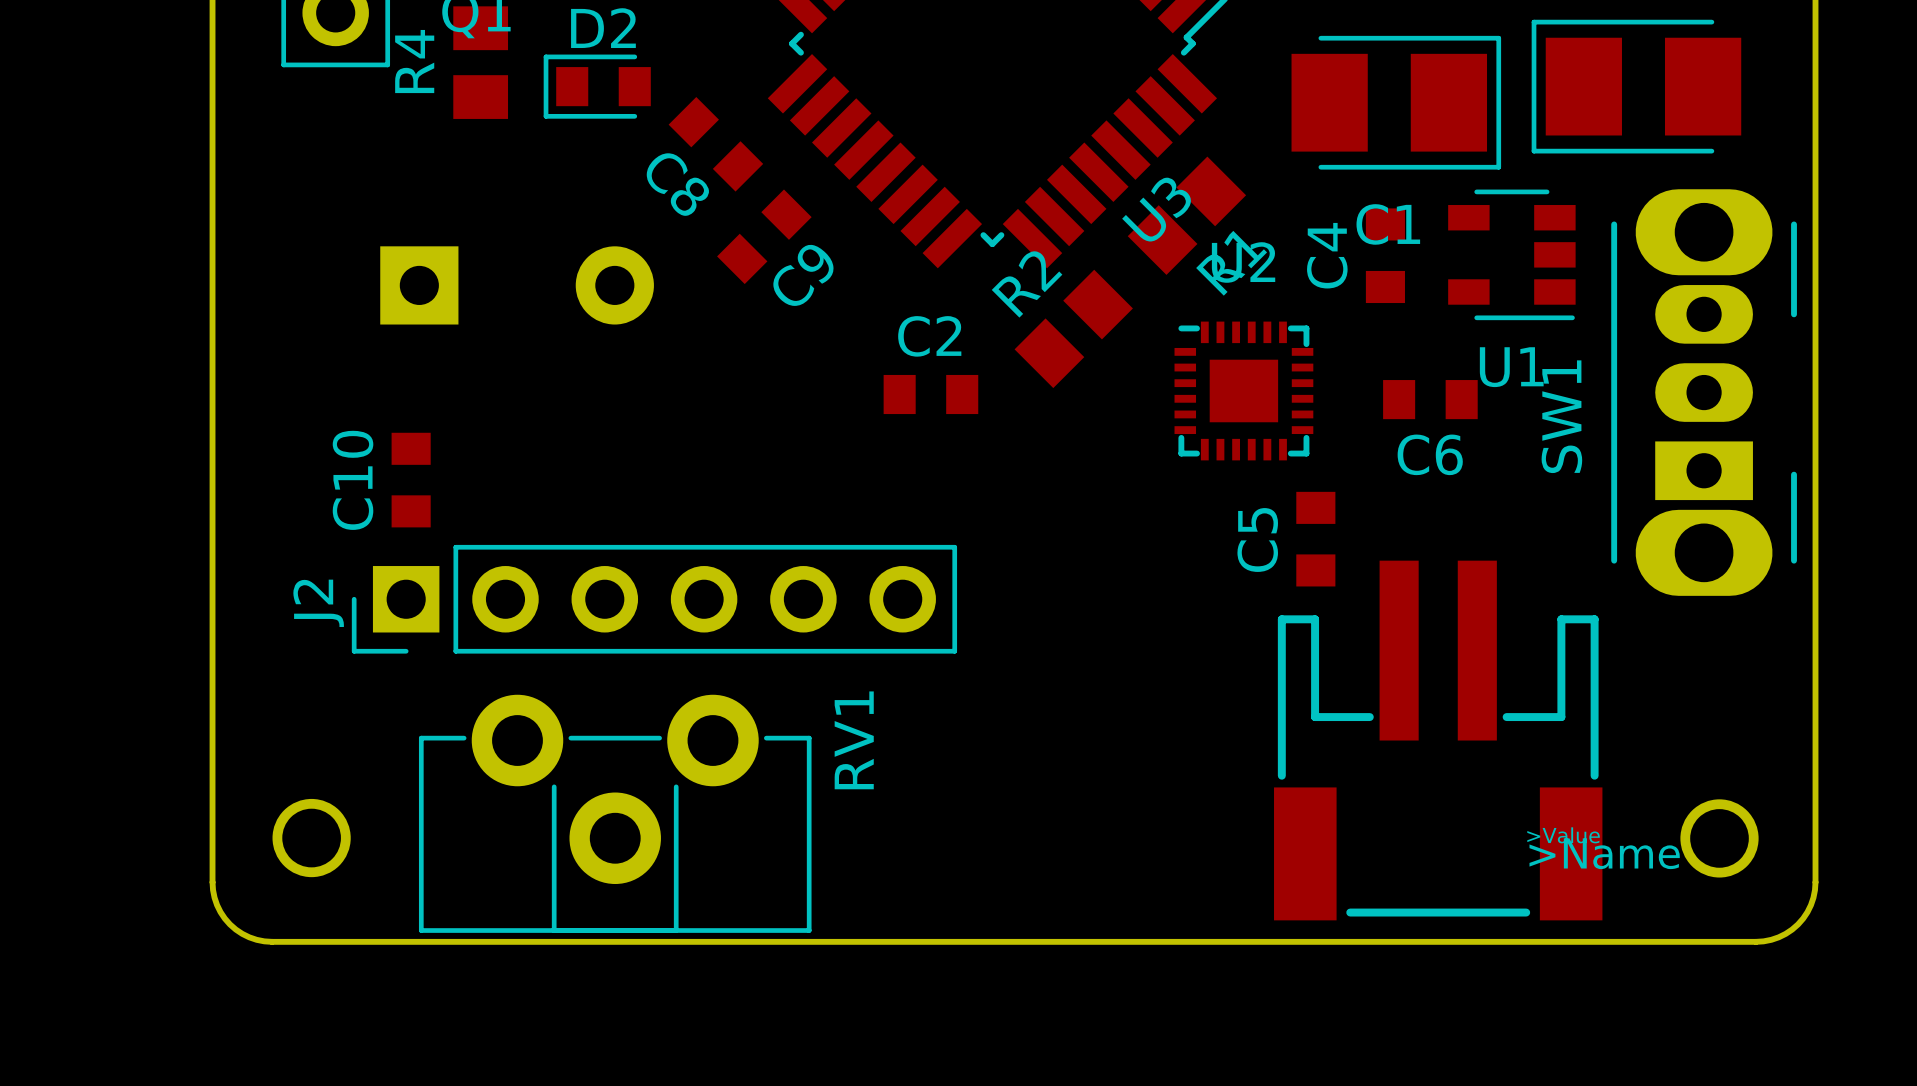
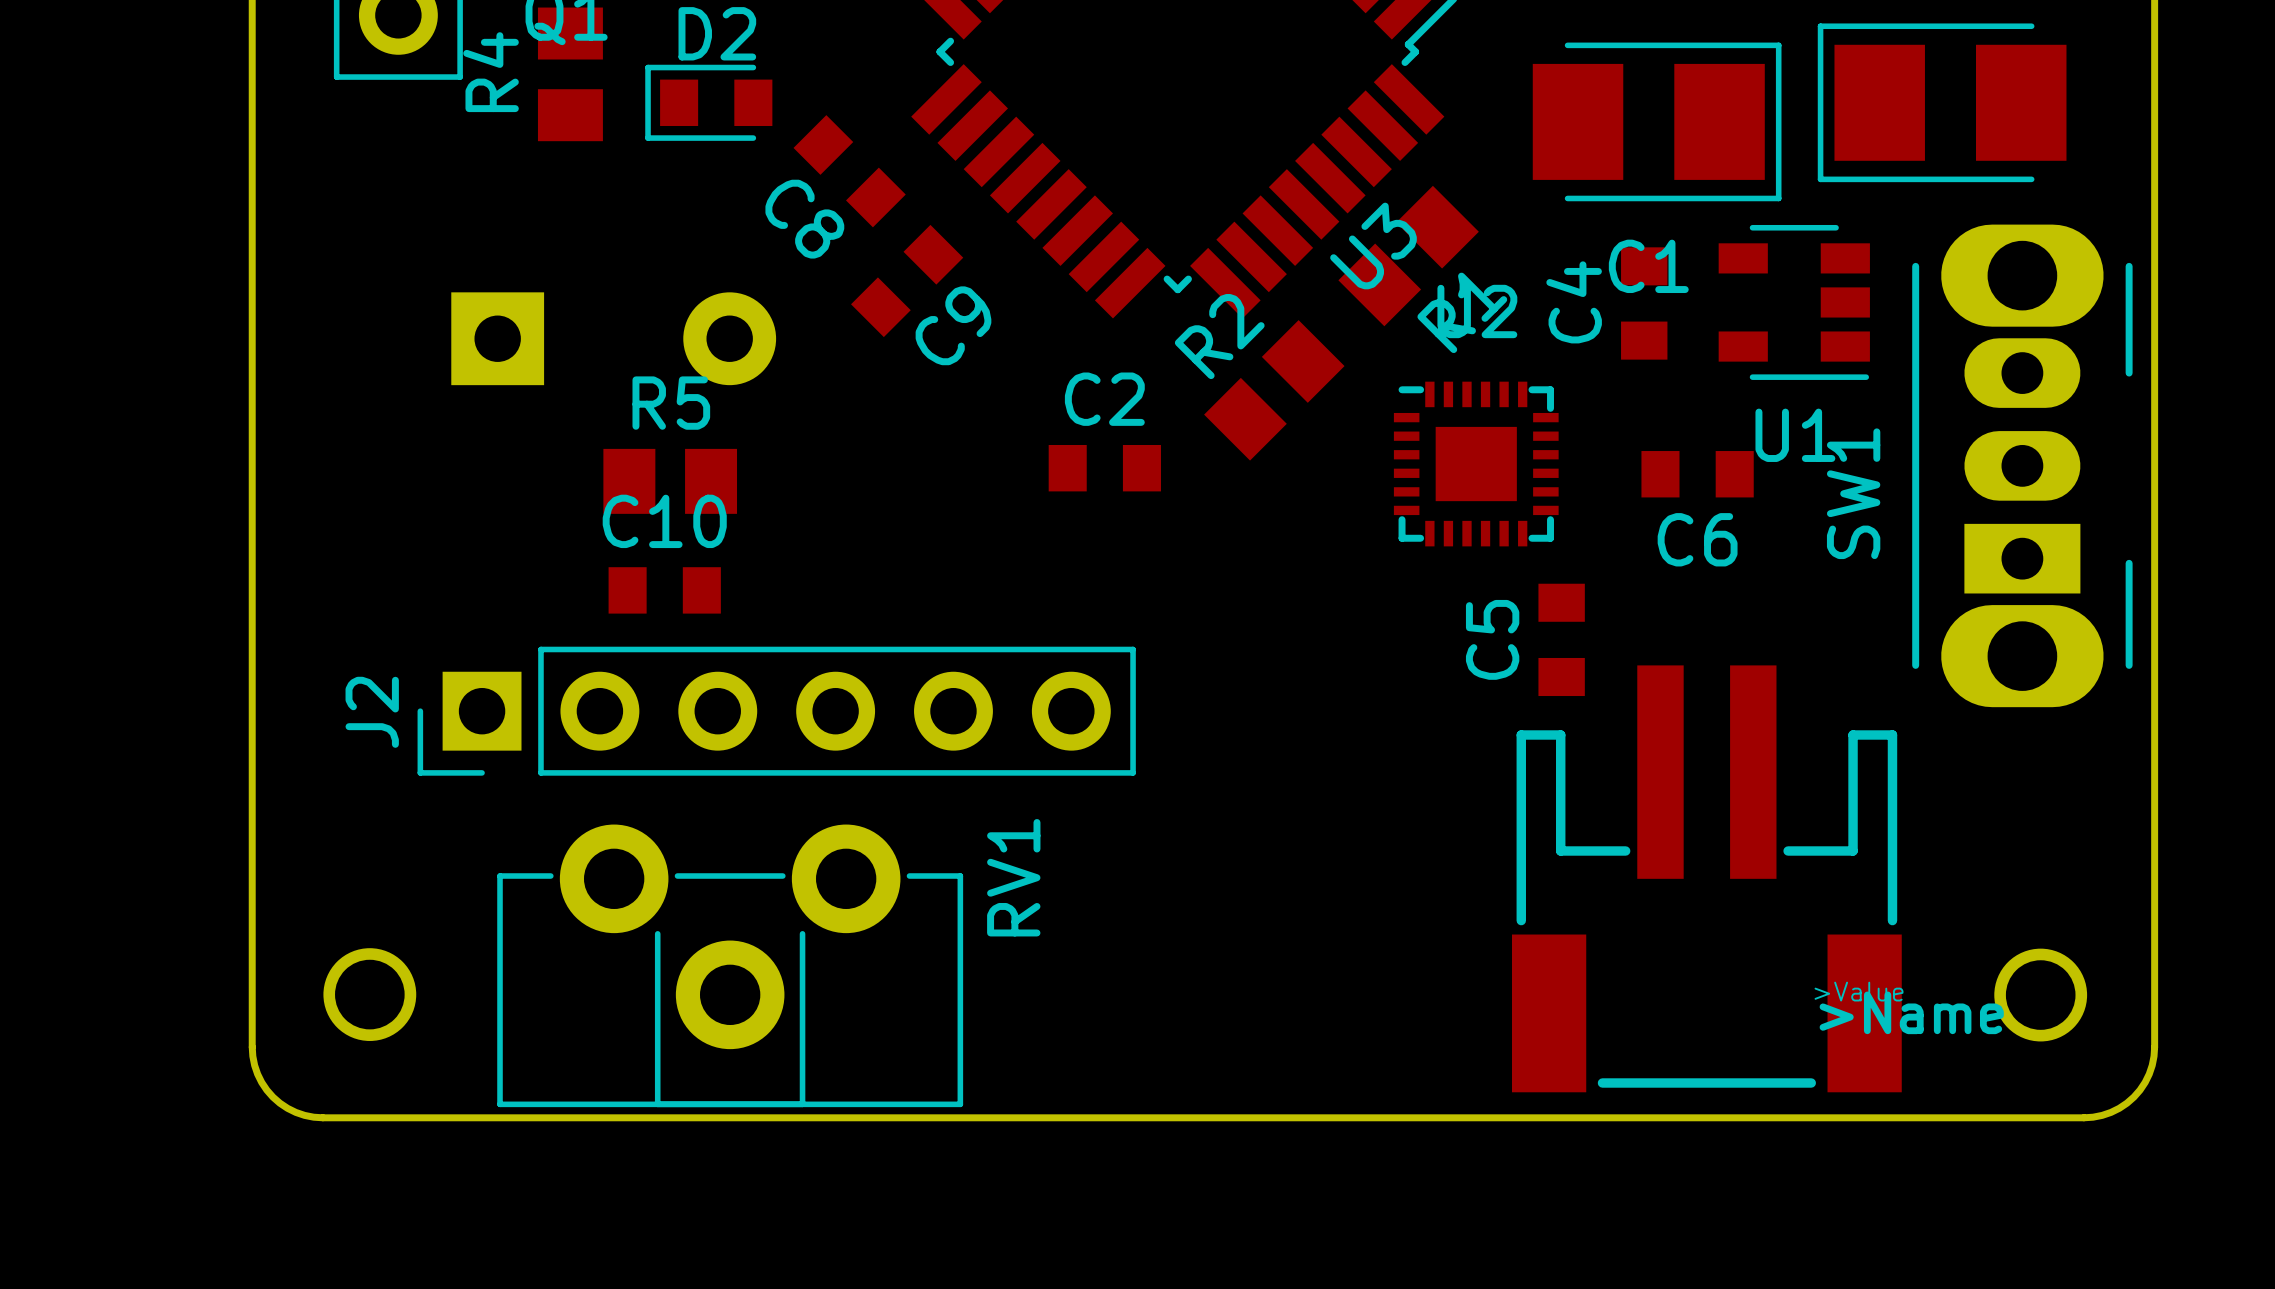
R5: none -> (670, 481)
C10 rotation: 0° (411, 480) -> 90° clockwise (664, 590)
C10 position: (411, 480) -> (664, 590)

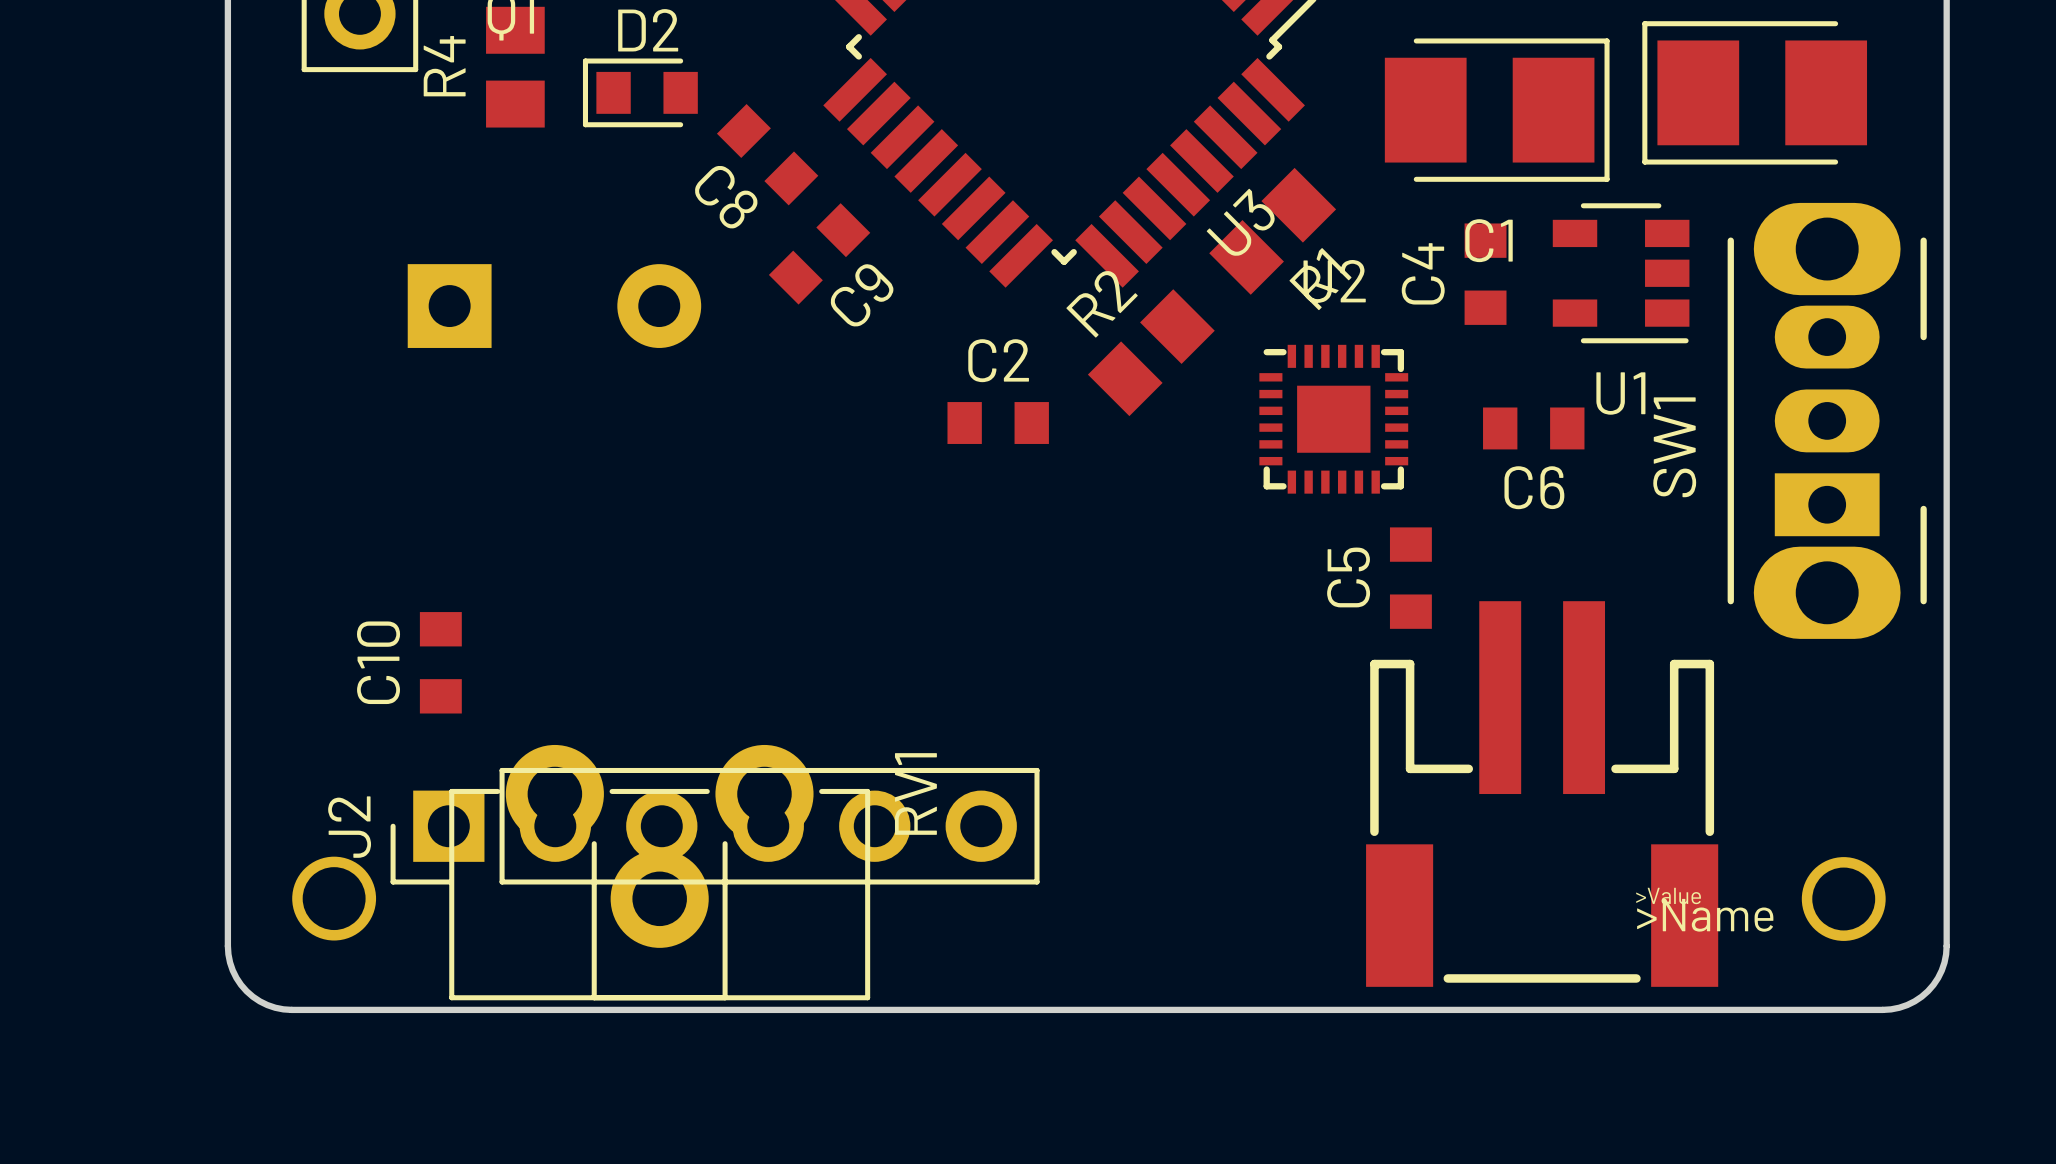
R5: (670, 481) -> none
C10 name position: C10 (664, 521) -> C10 (378, 662)
C10 rotation: 0° (664, 590) -> 90° clockwise (440, 662)
C10 position: (664, 590) -> (440, 662)
J2 position: (776, 711) -> (715, 826)

